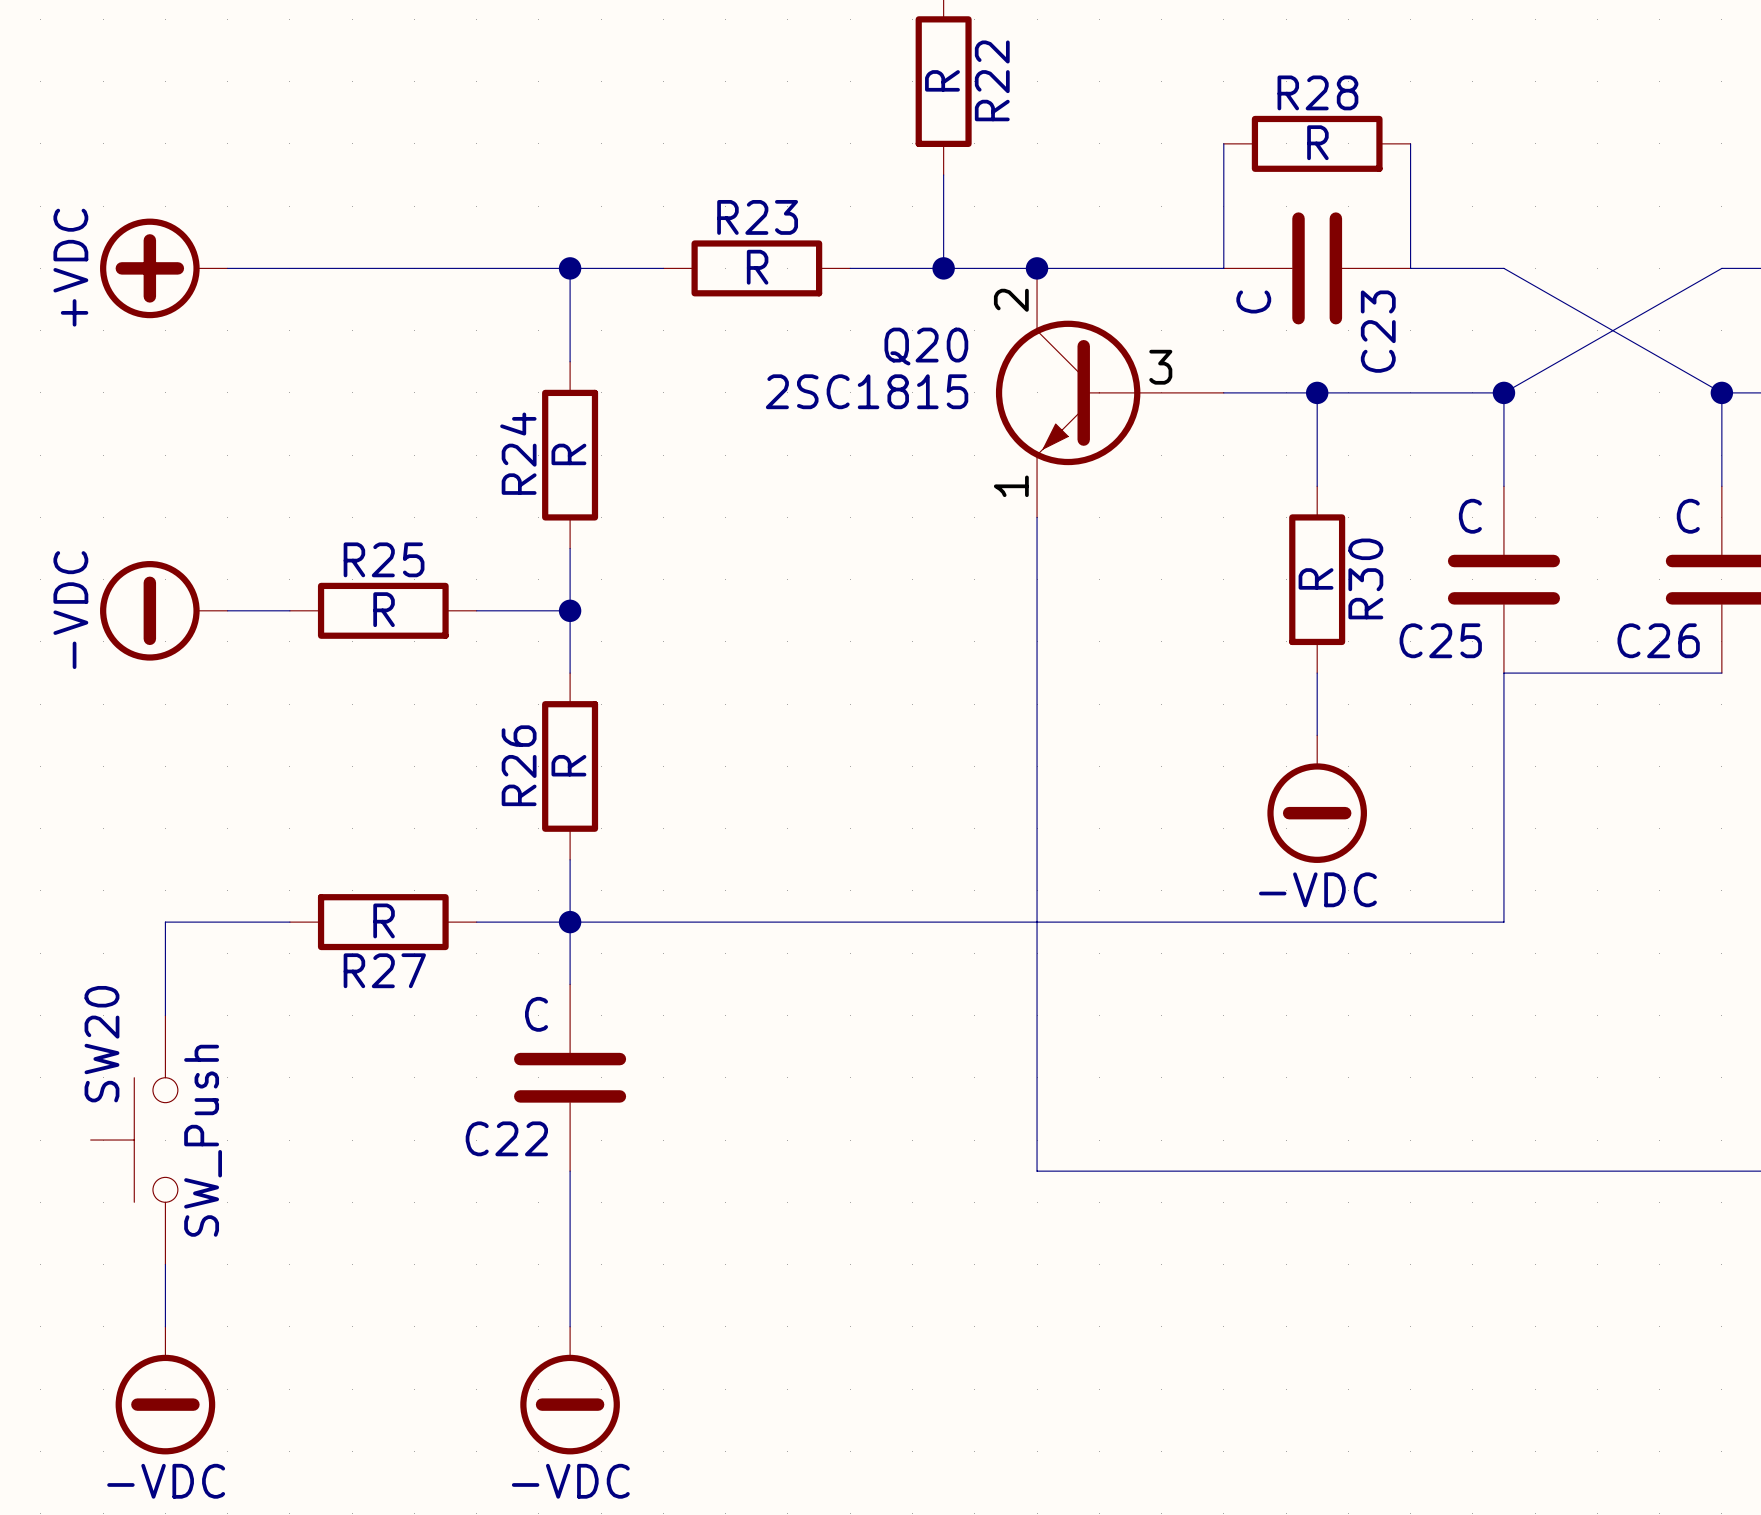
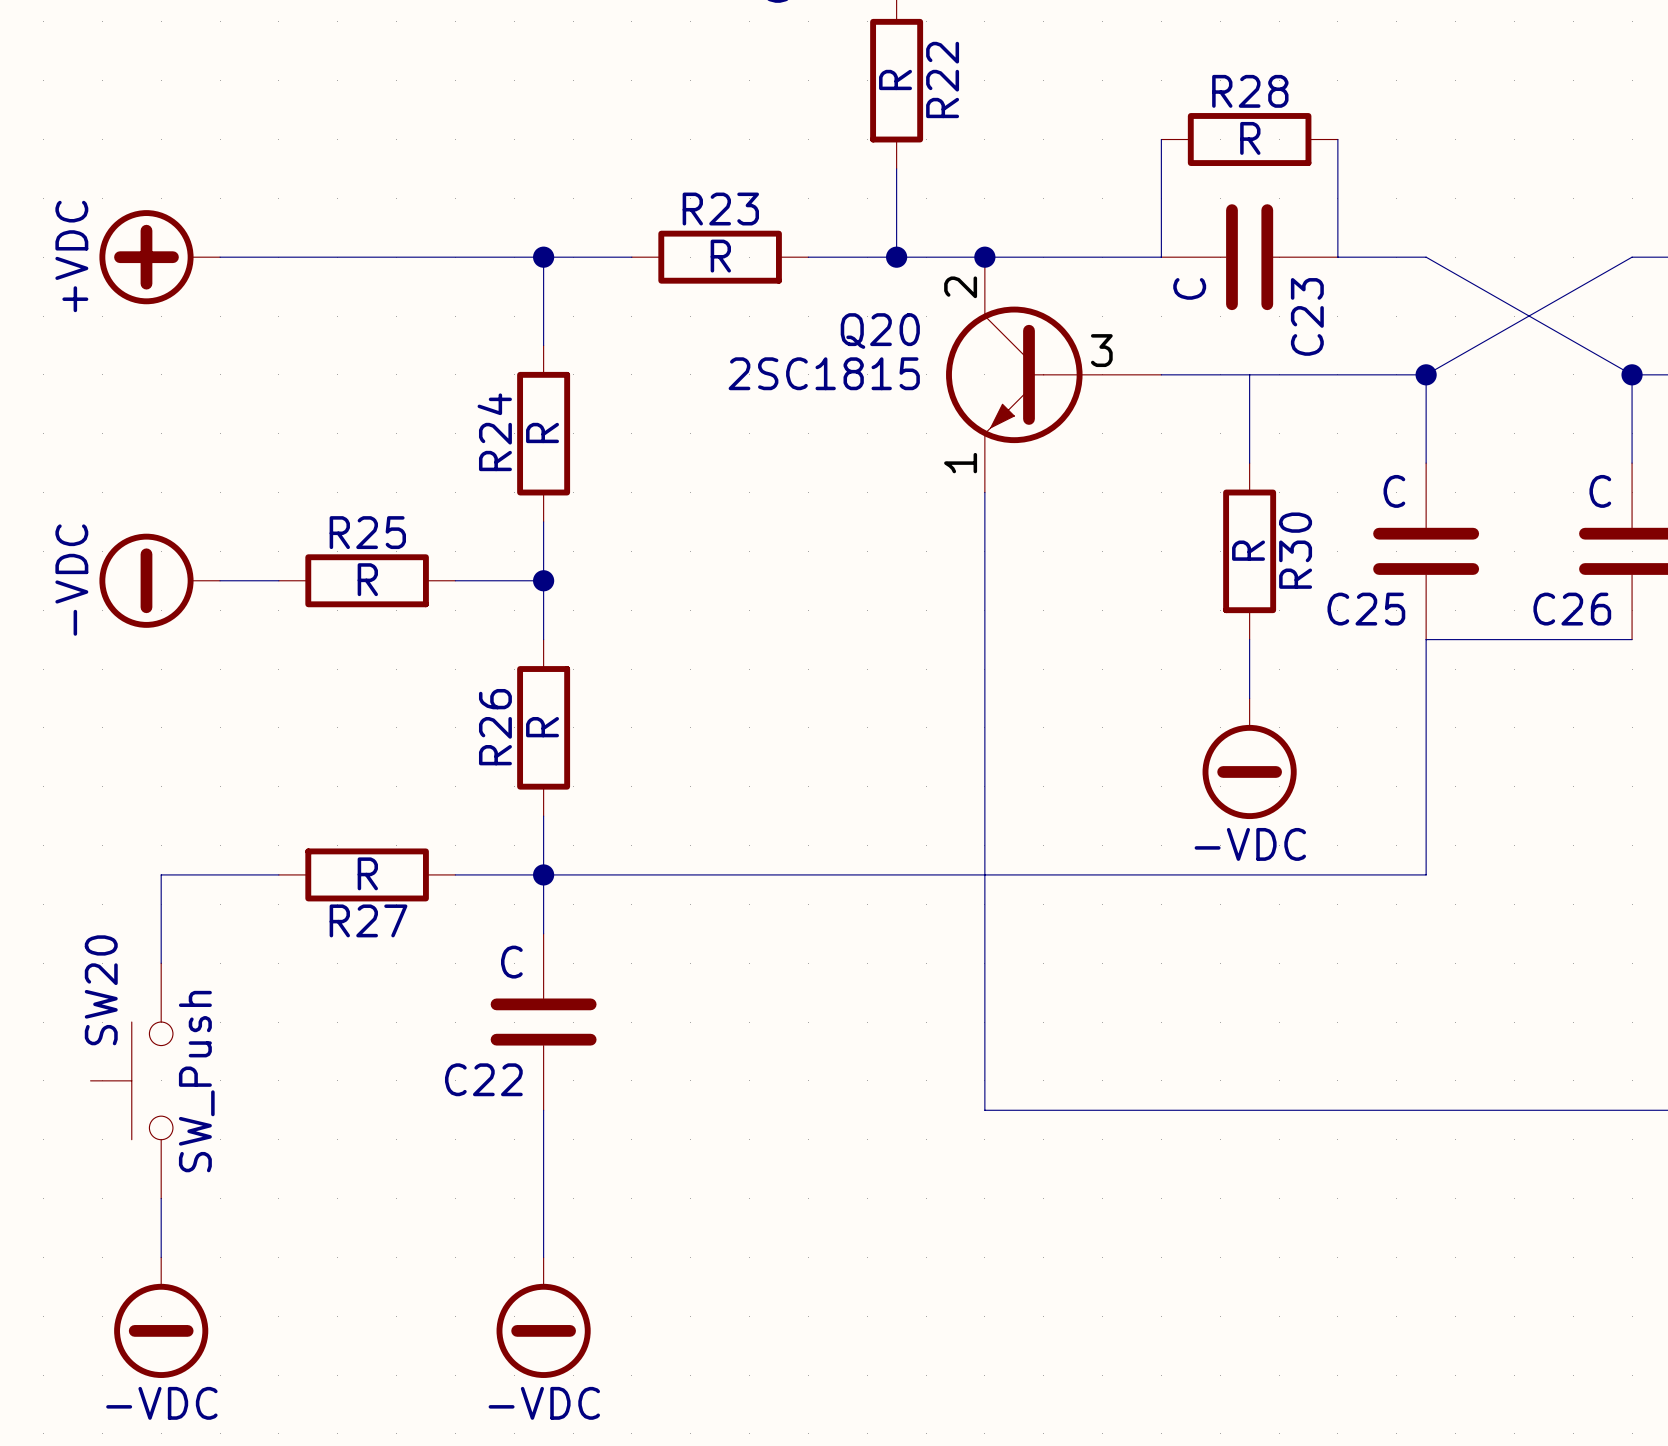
junction: (1317, 392) -> none

